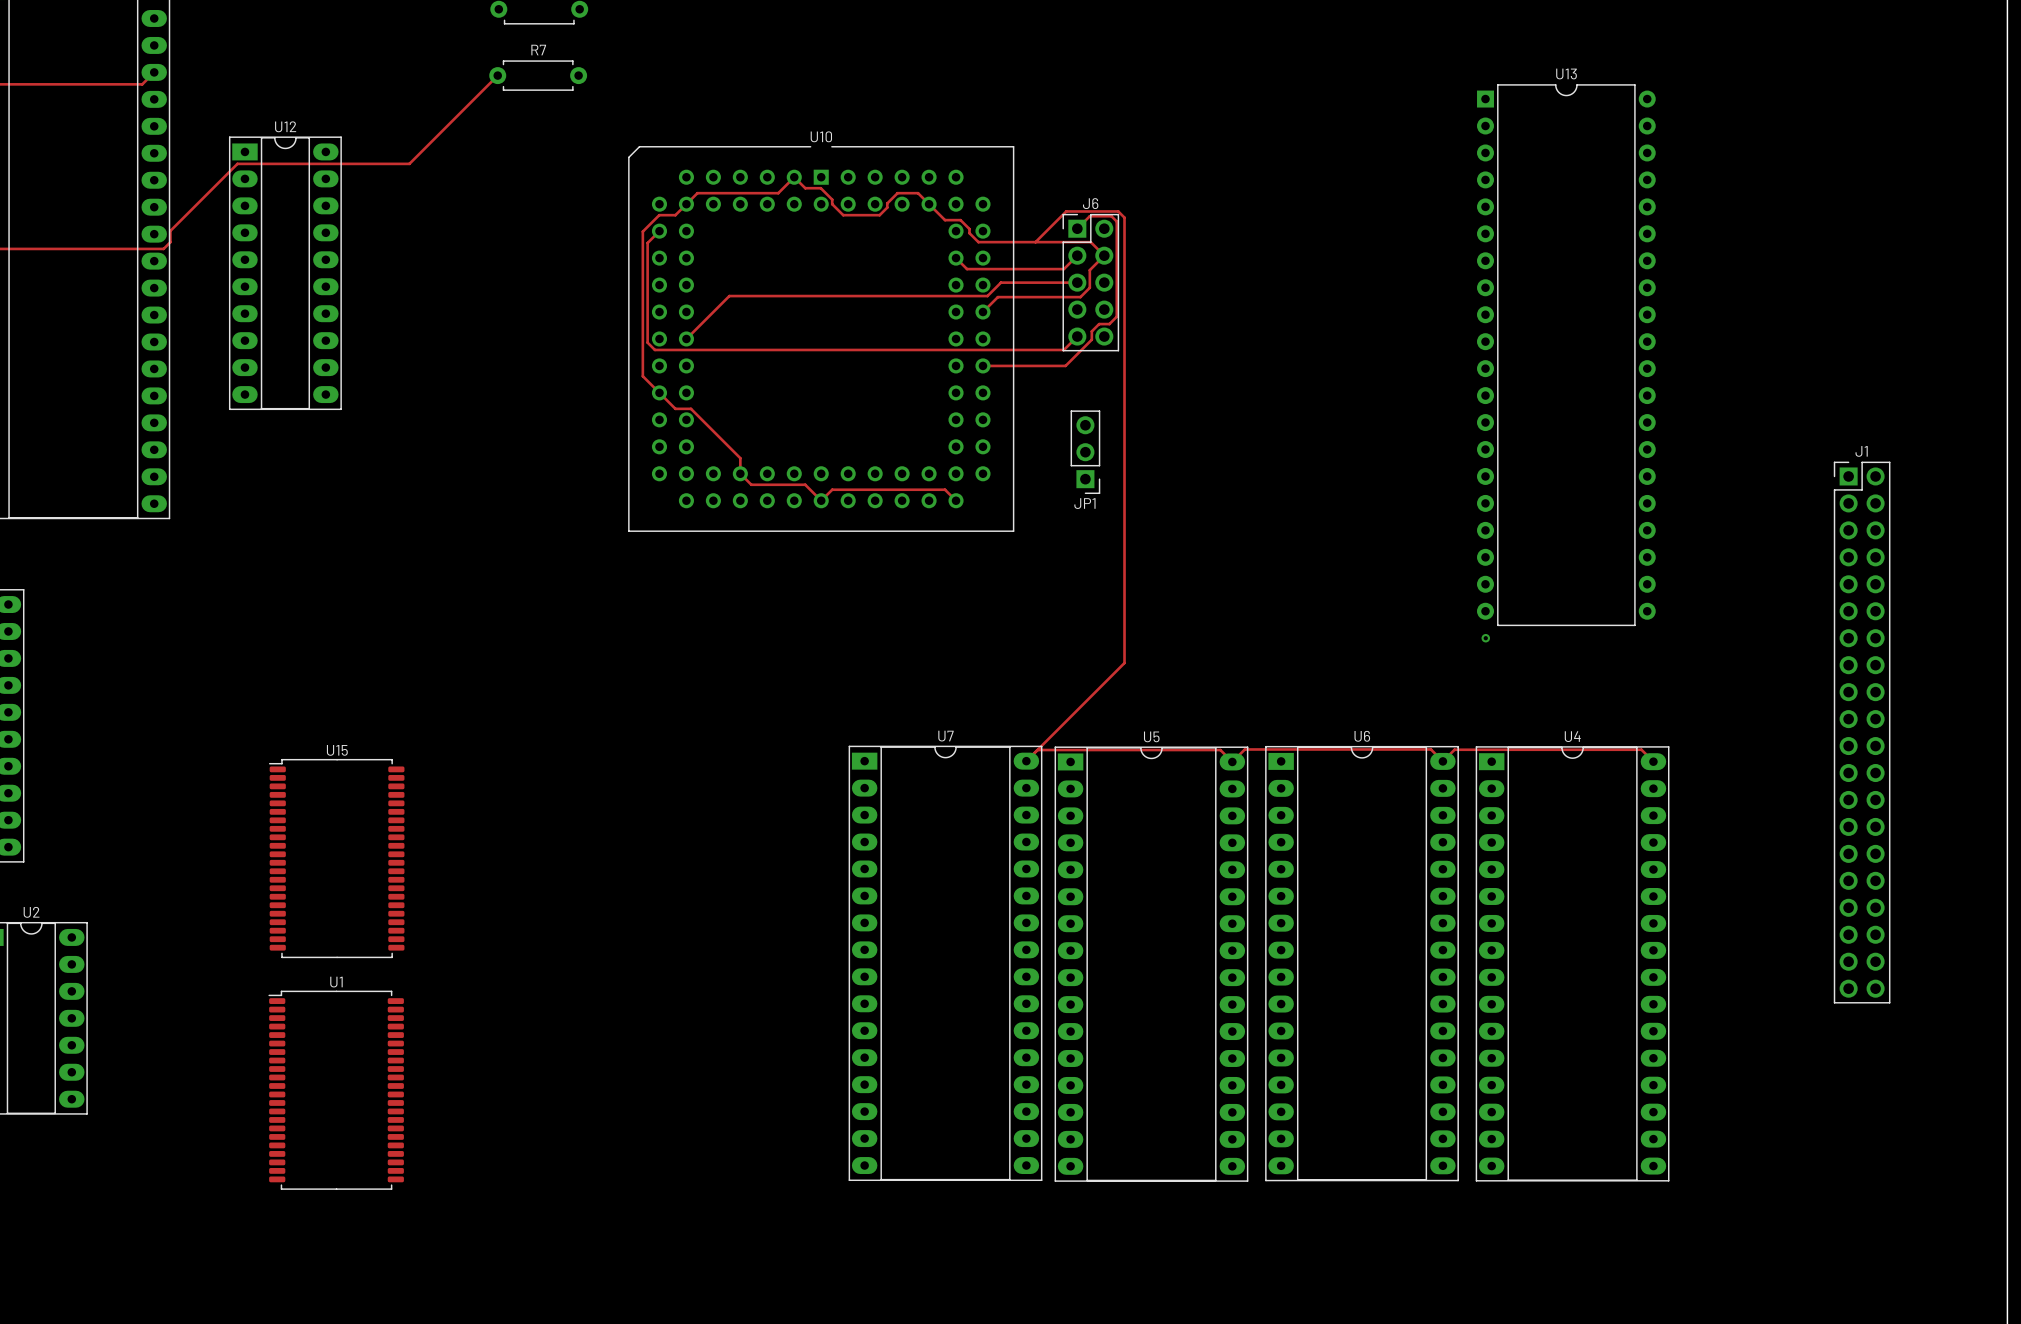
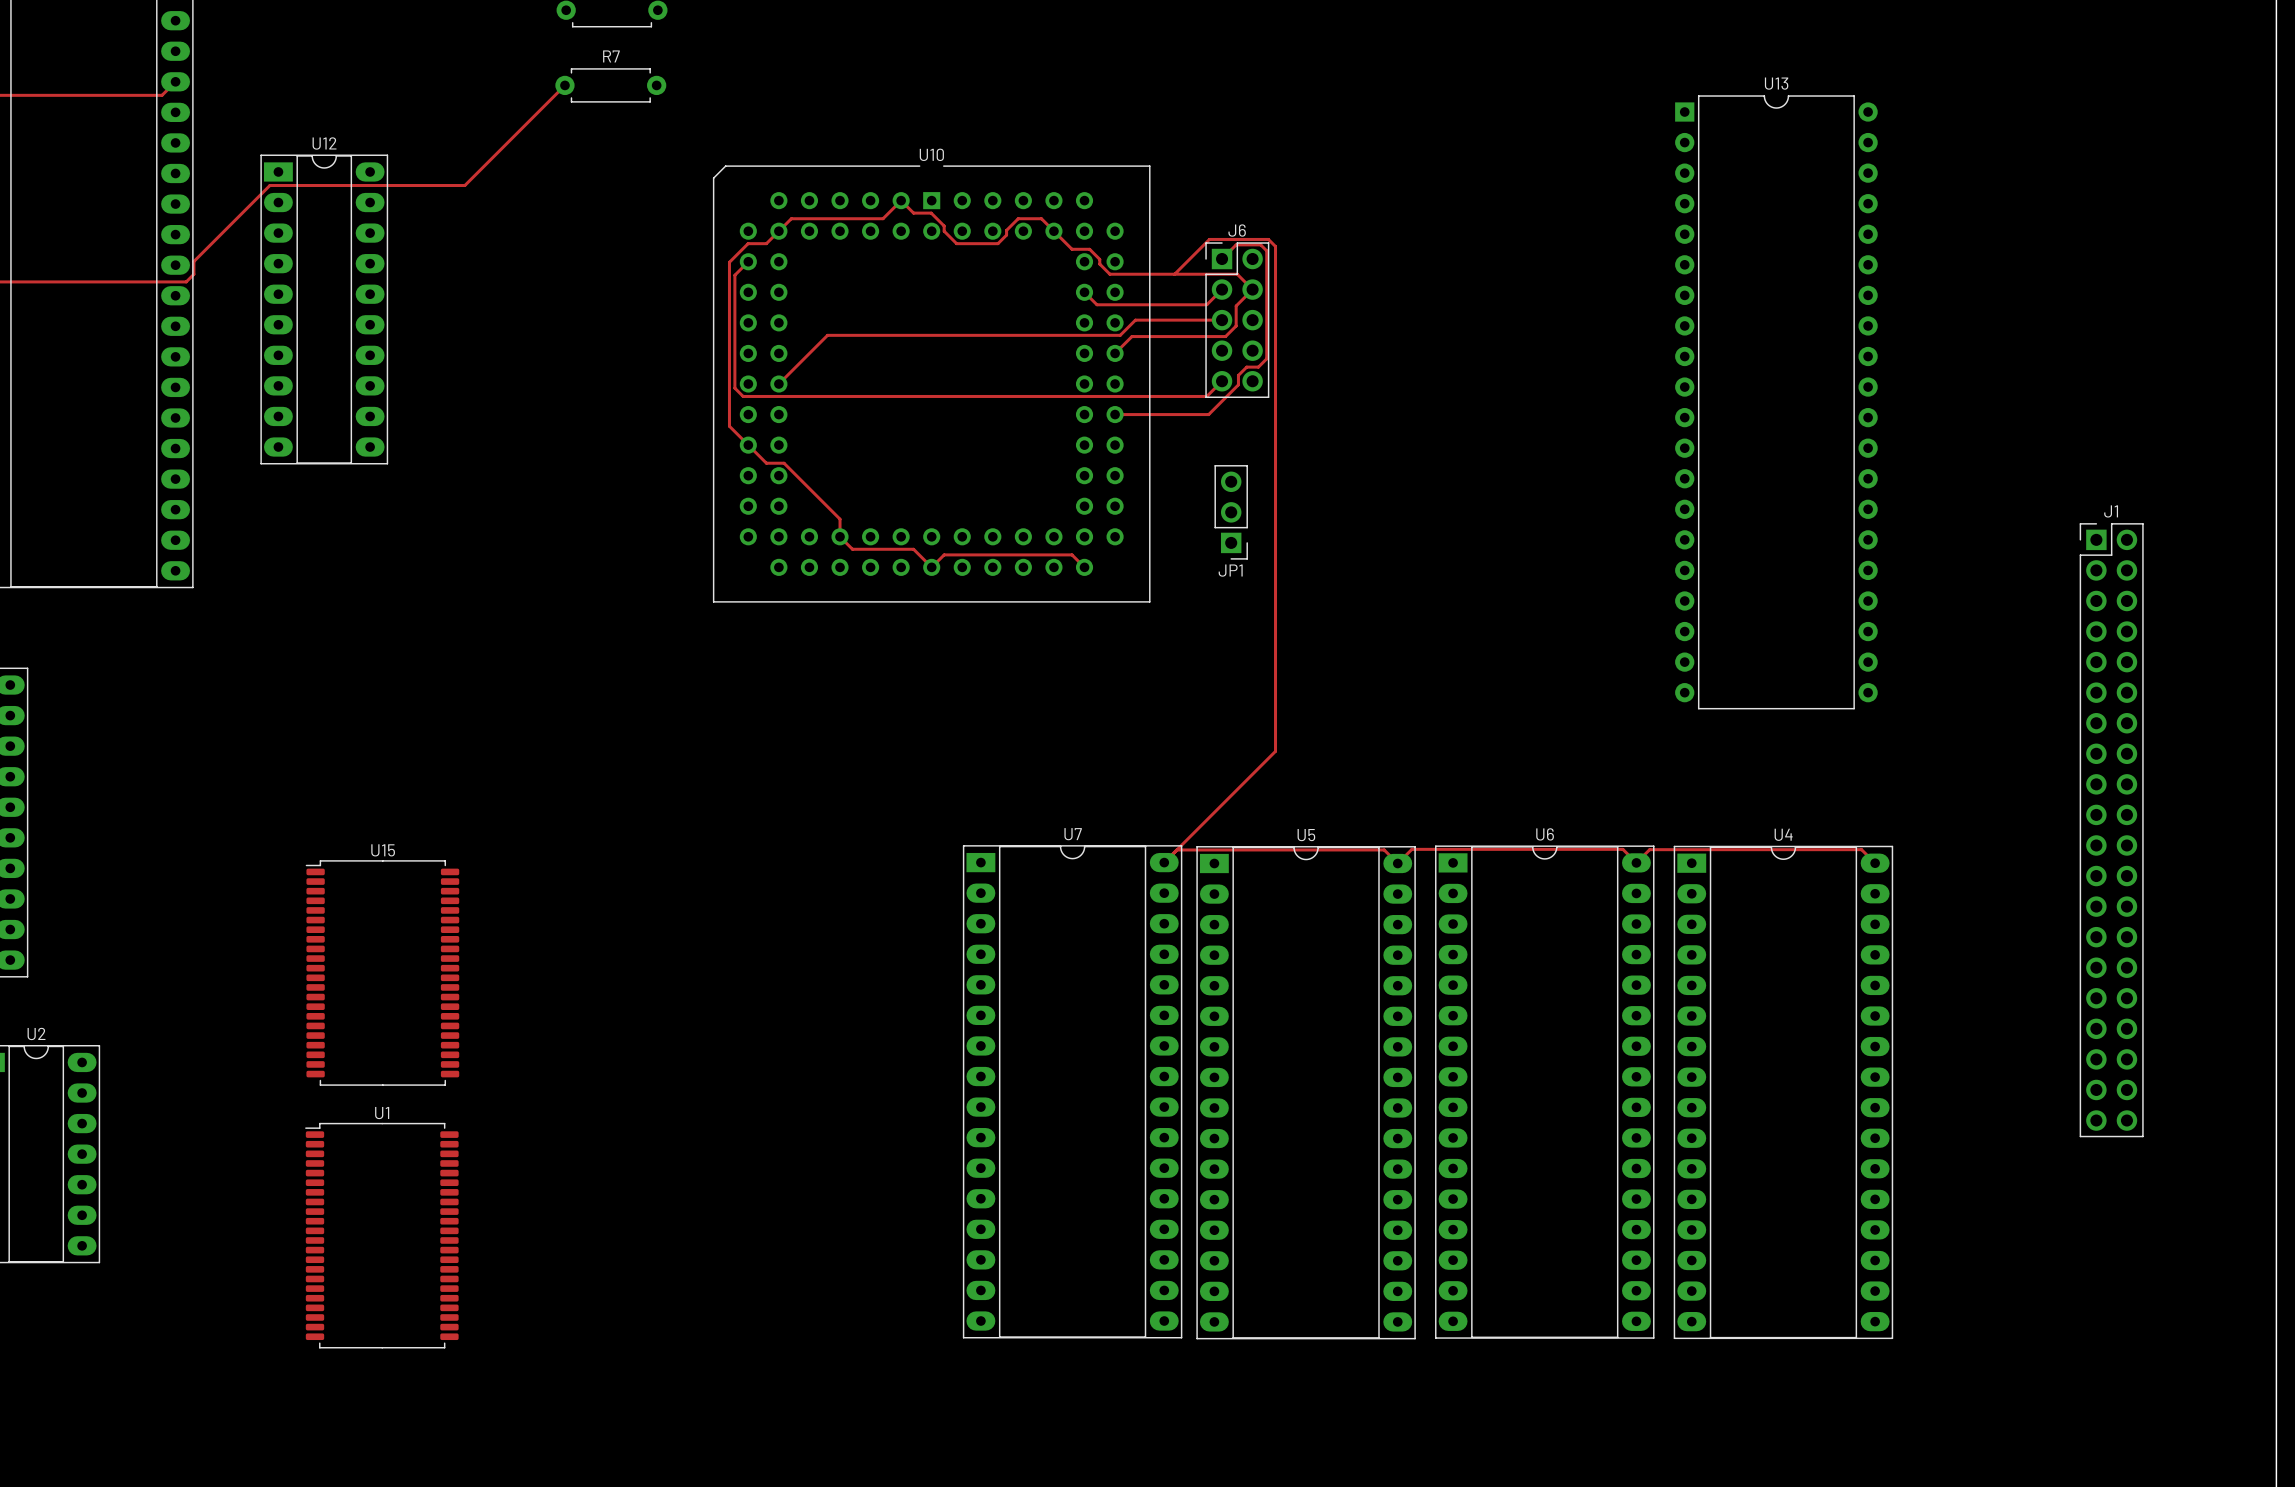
via: (1485, 638) -> none

